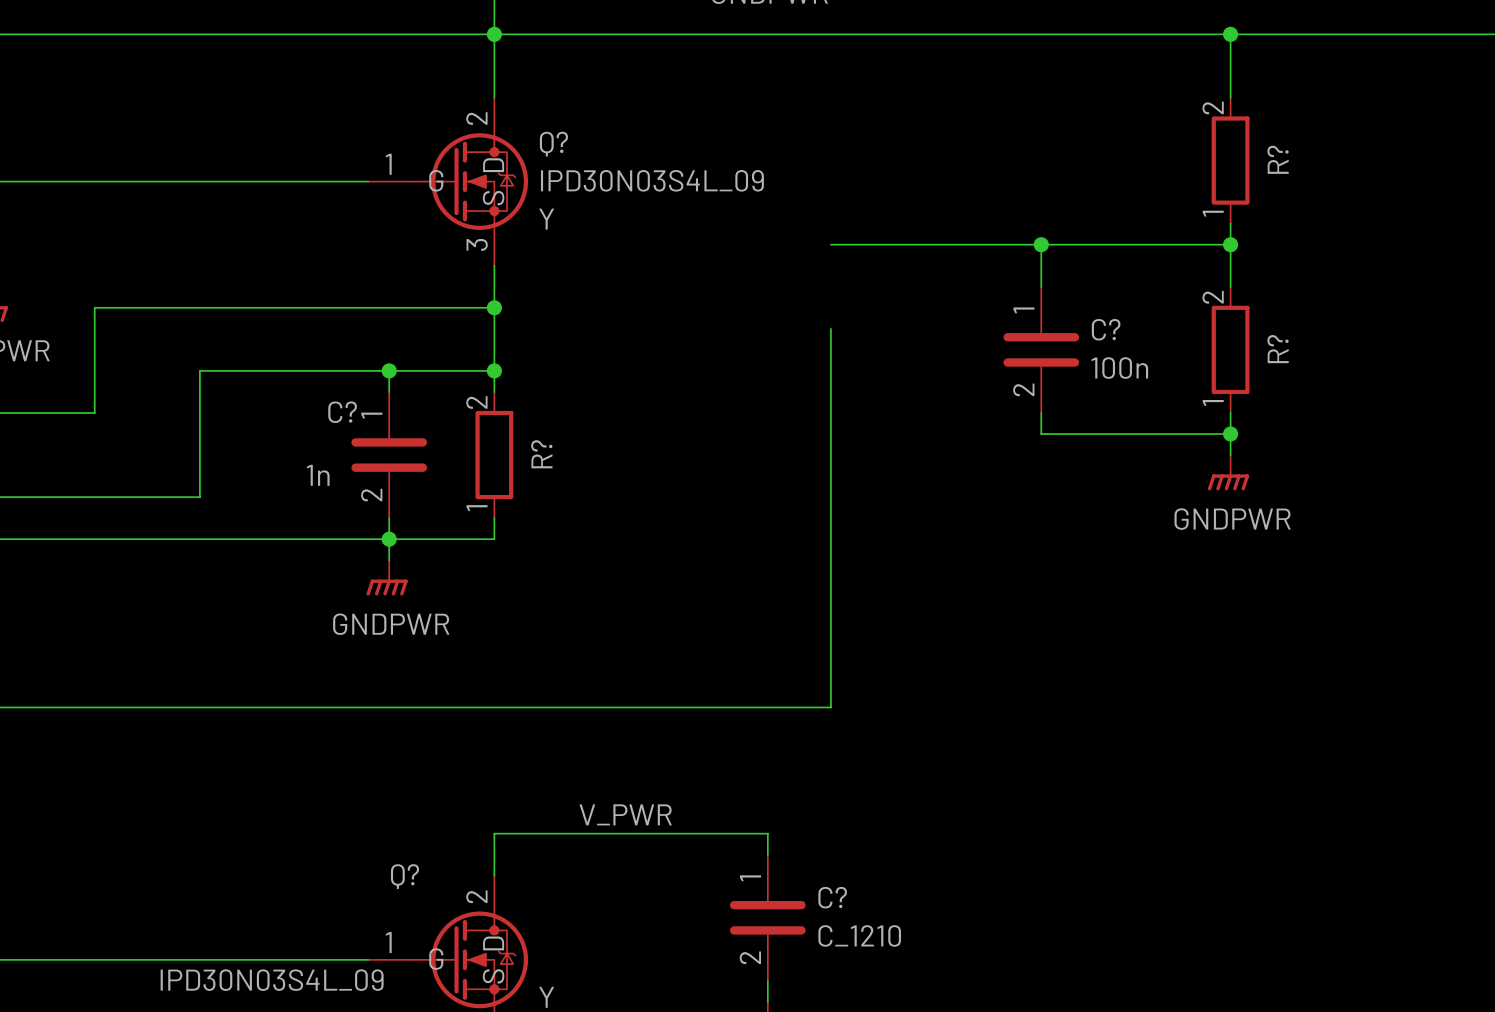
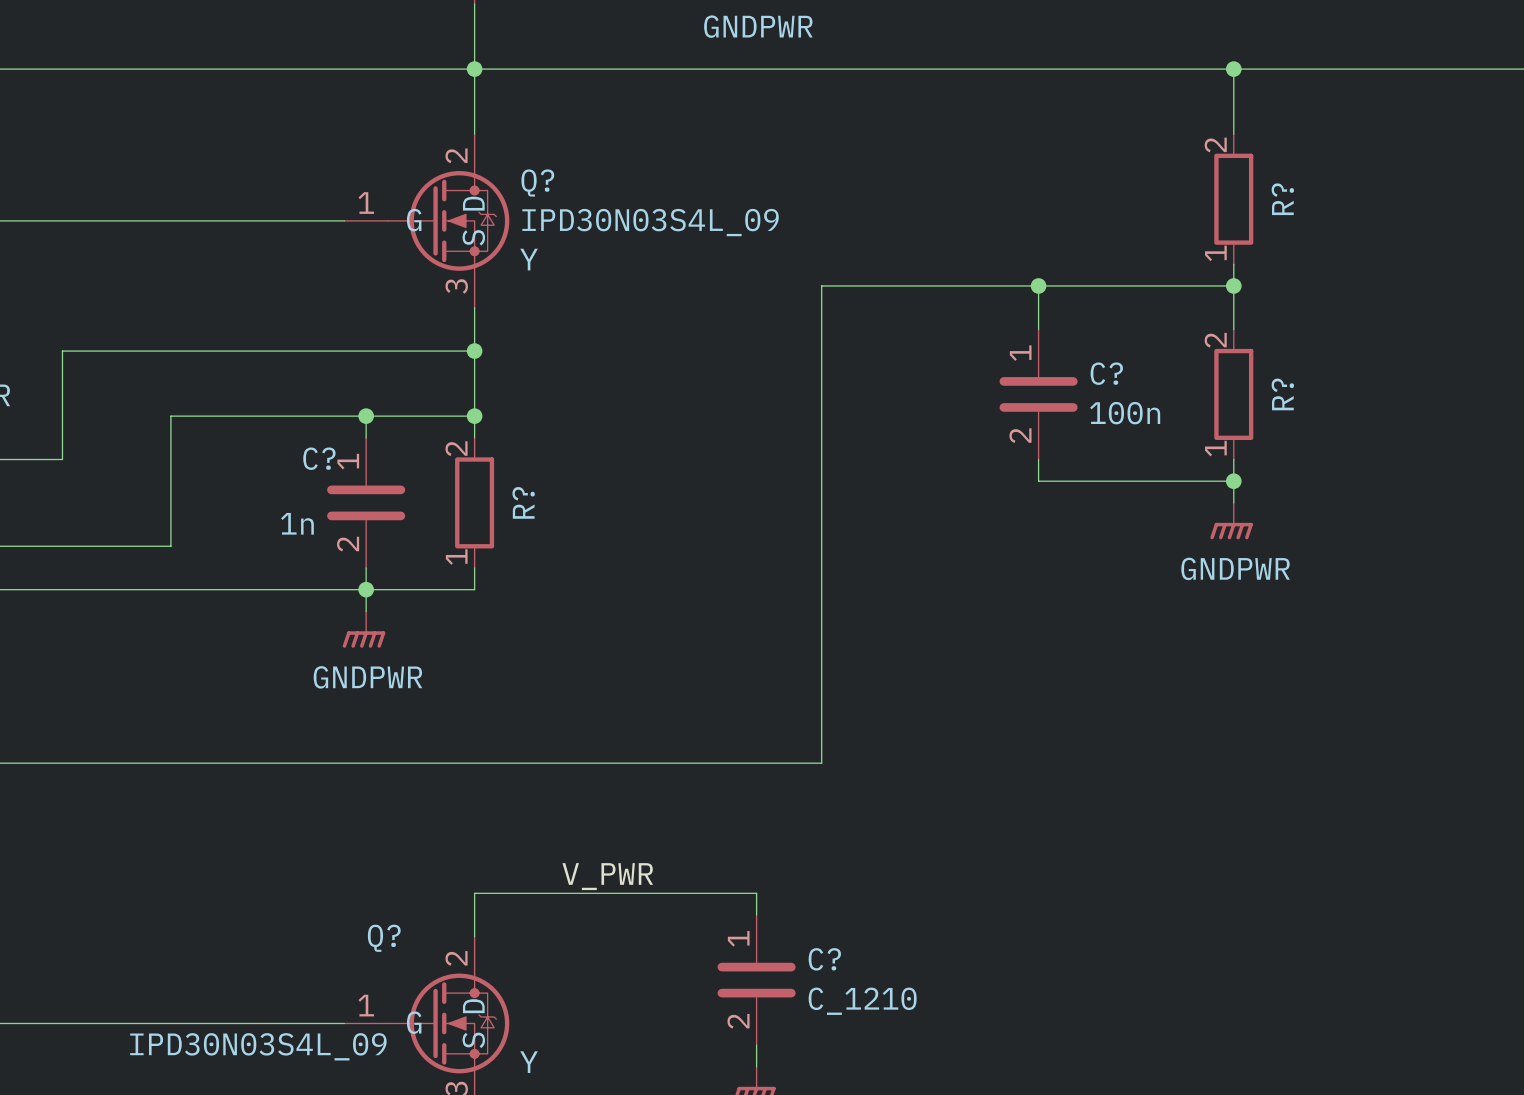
wire: none -> (821, 285) (821, 372)

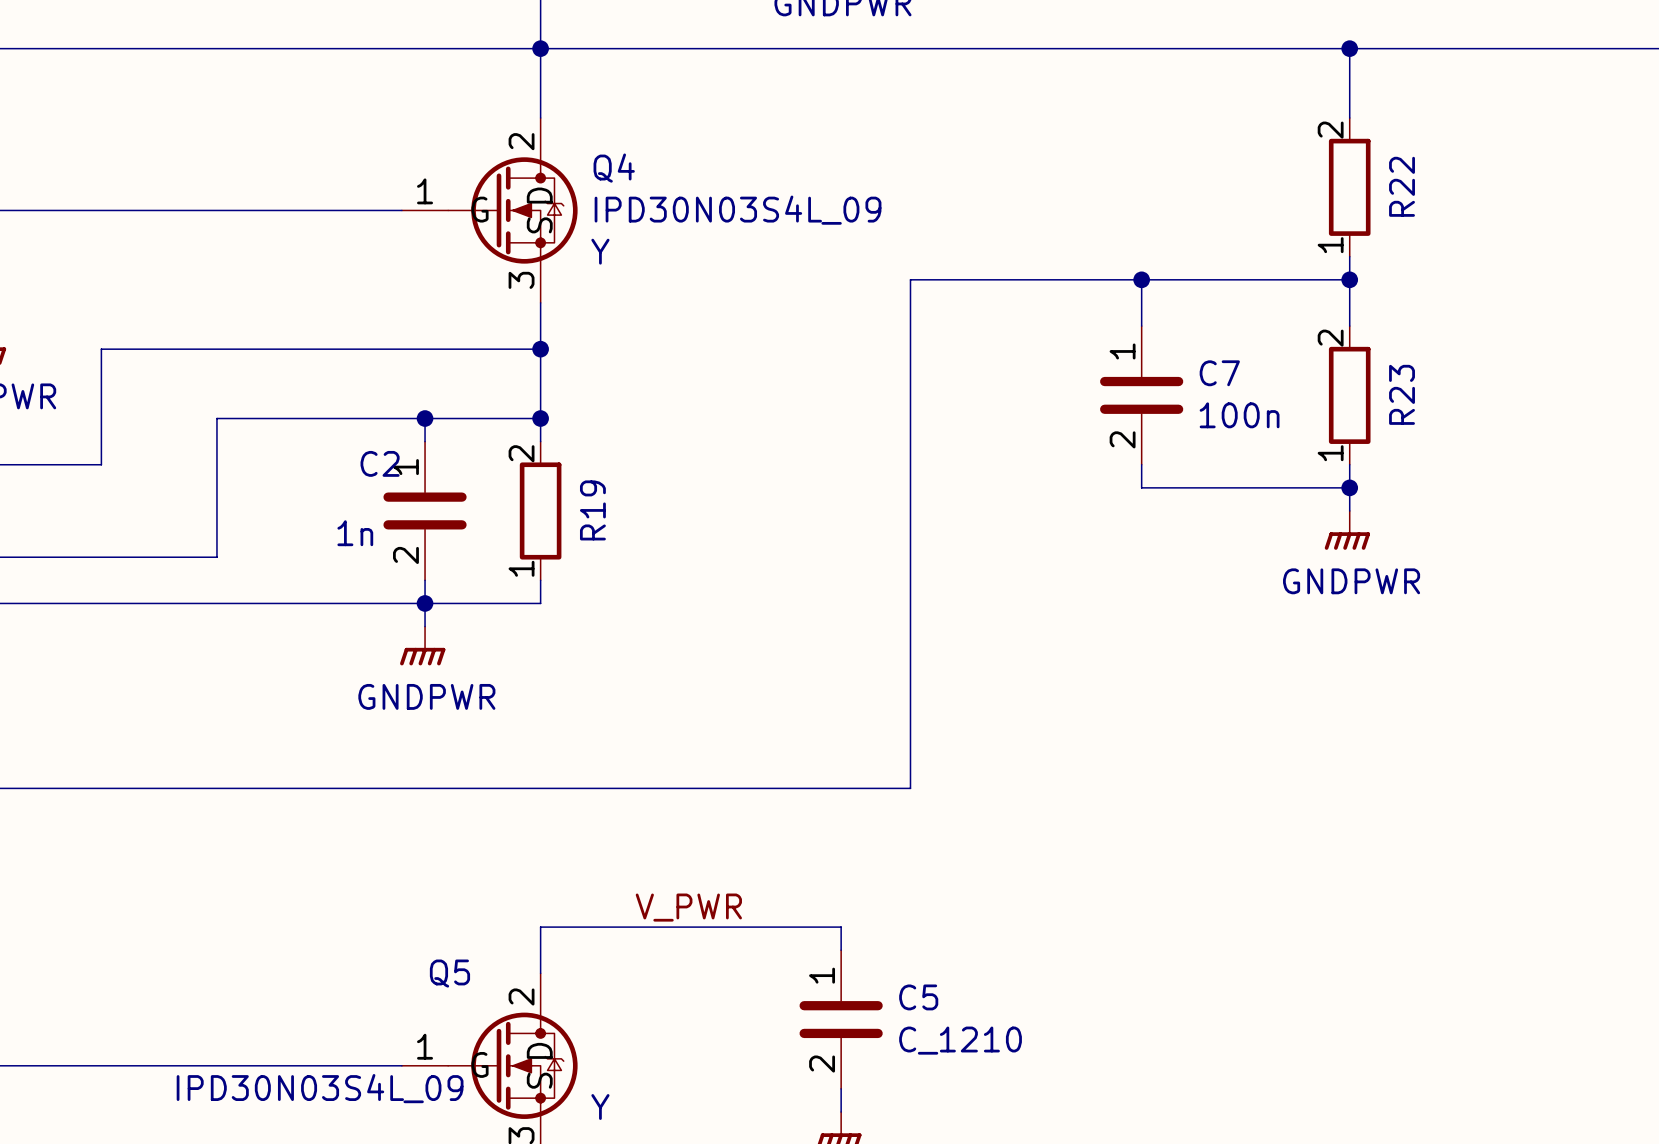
Q? name: Q? (537, 182) -> Q4 (614, 168)
R? name: R? (1282, 199) -> R22 (1402, 186)
C? name: C? (1106, 373) -> C7 (1219, 373)
R? name: R? (1282, 394) -> R23 (1402, 394)
C? name: C? (319, 458) -> C2 (380, 463)
R? name: R? (523, 502) -> R19 (592, 510)
Q? name: Q? (384, 938) -> Q5 (449, 973)
C? name: C? (824, 959) -> C5 (918, 997)

